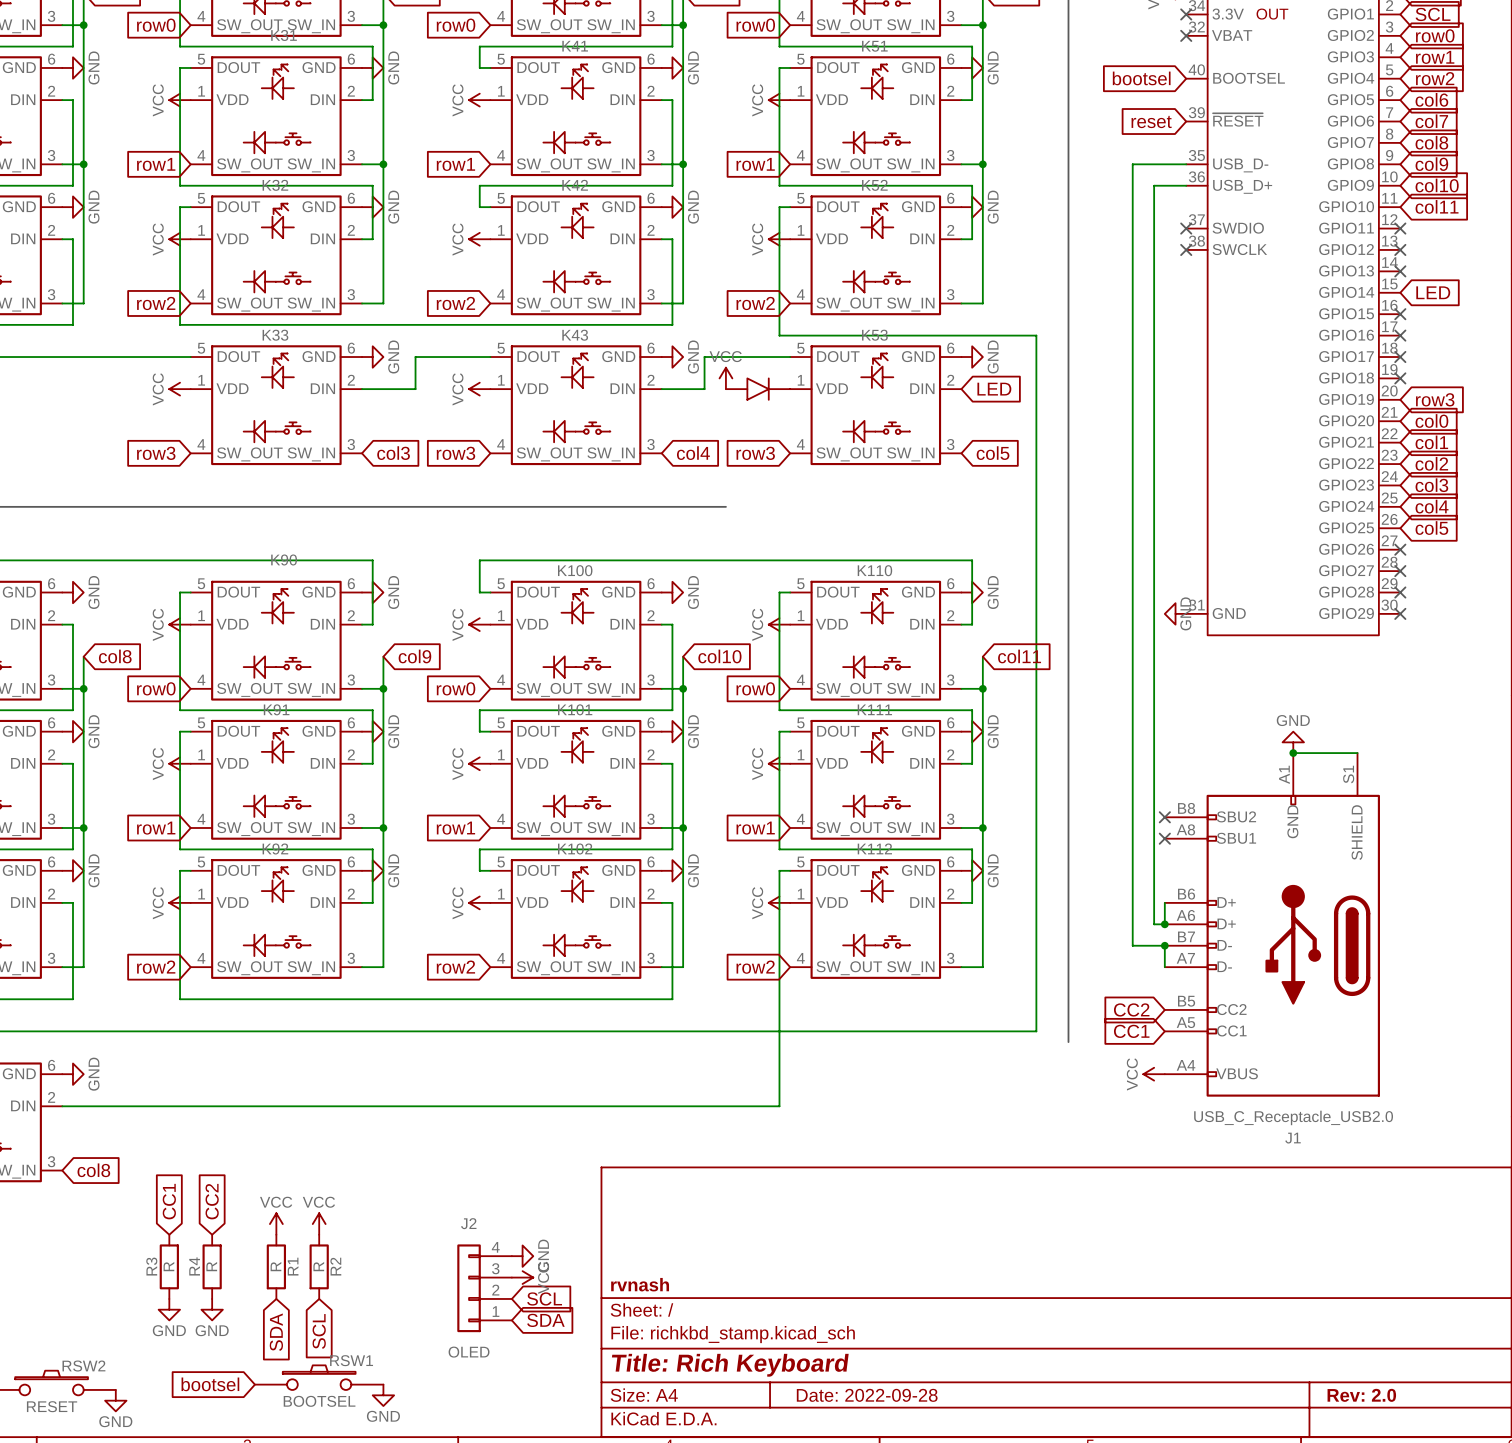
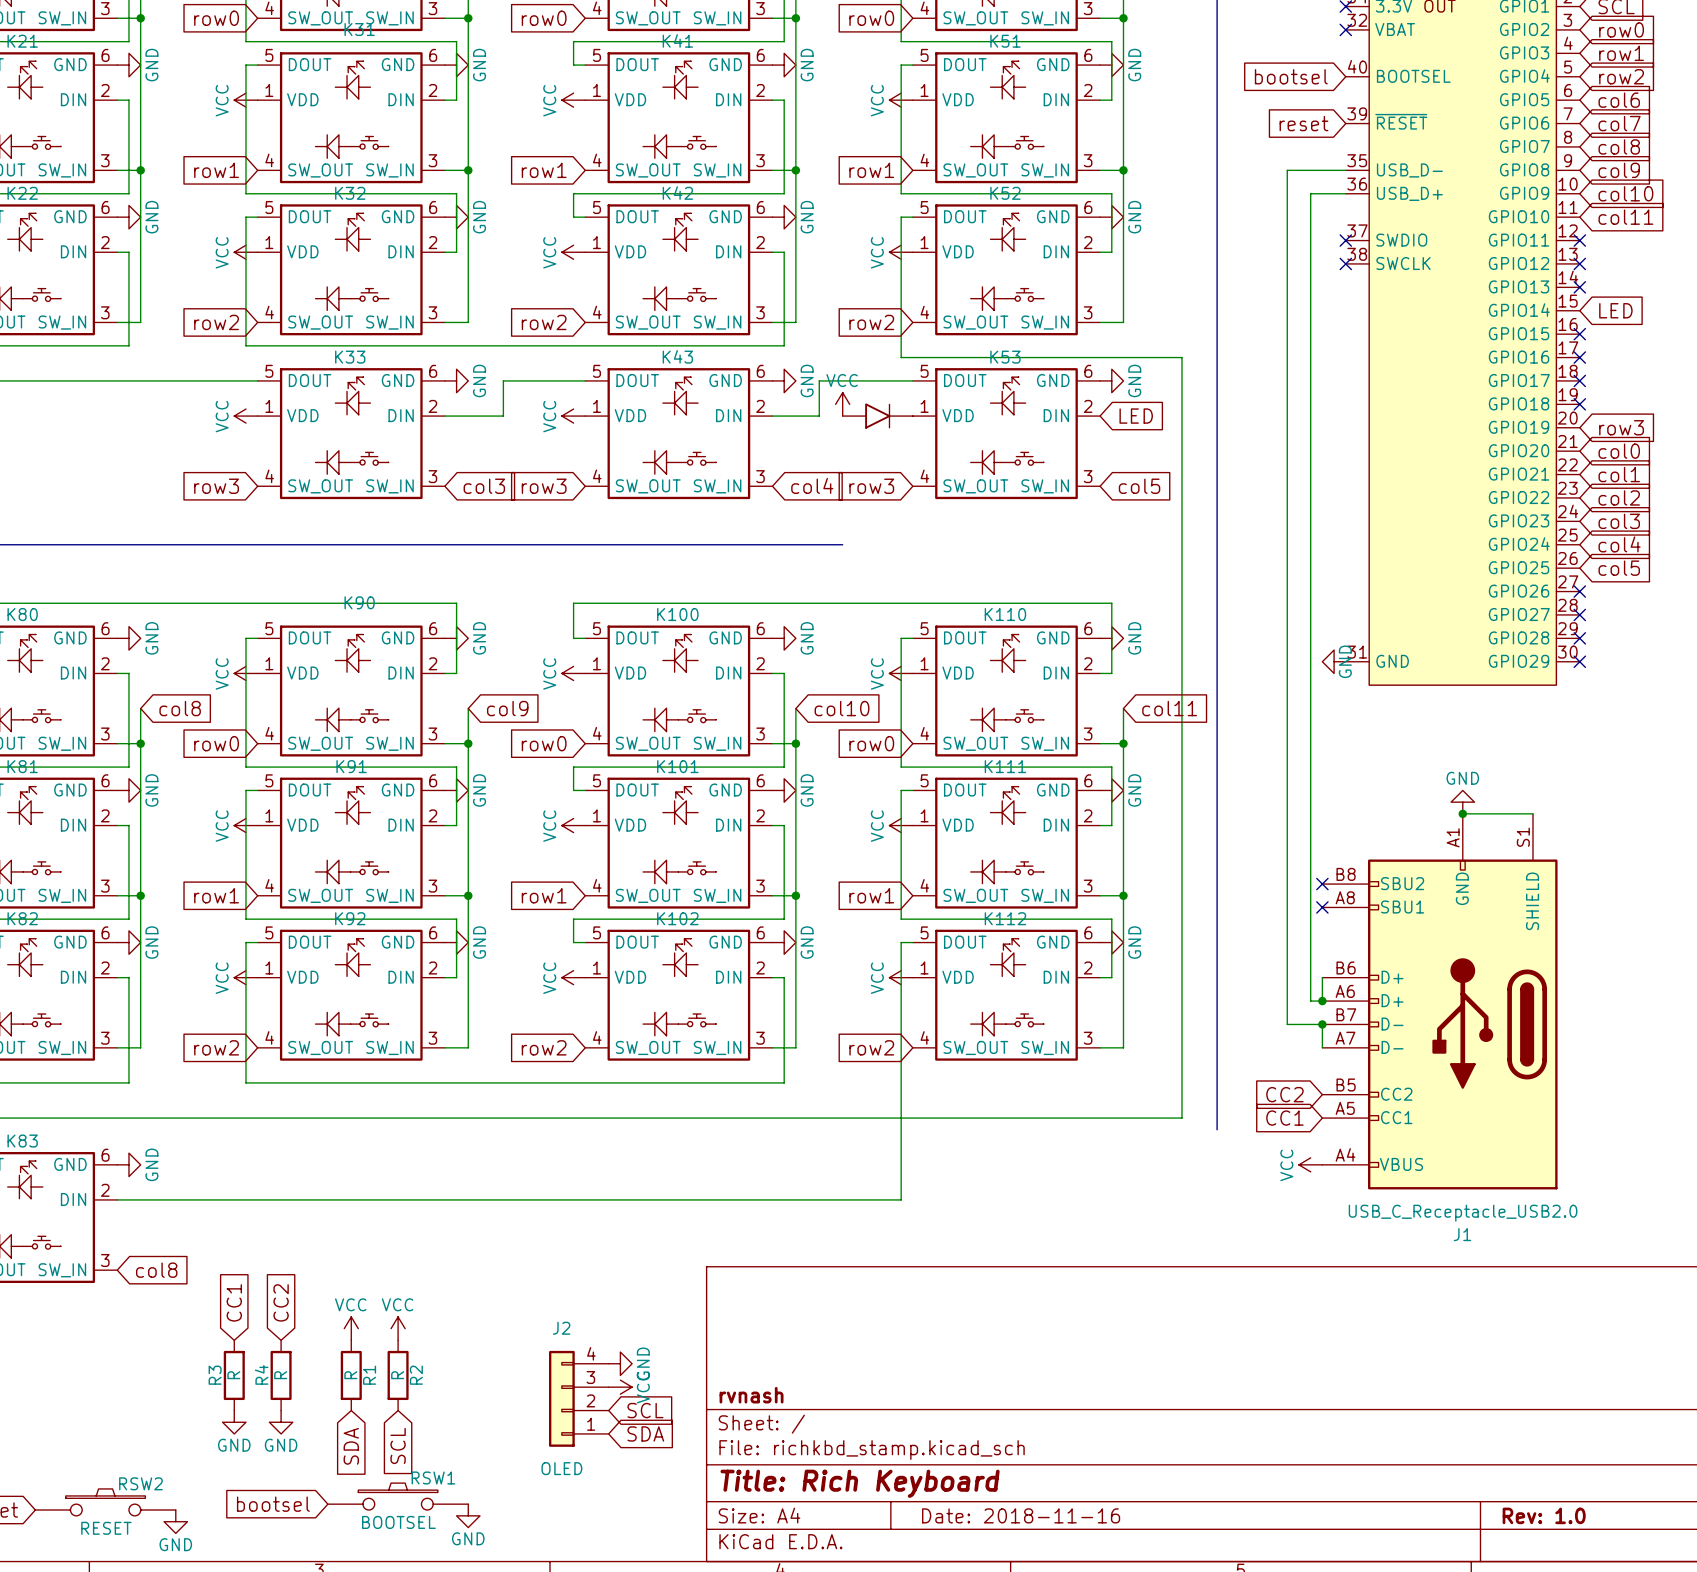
title block: Date: 2022-09-28 (867, 1395) -> Date: 2018-11-16 (1021, 1515)
title block: Rev: 2.0 (1361, 1395) -> Rev: 1.0 (1544, 1515)

